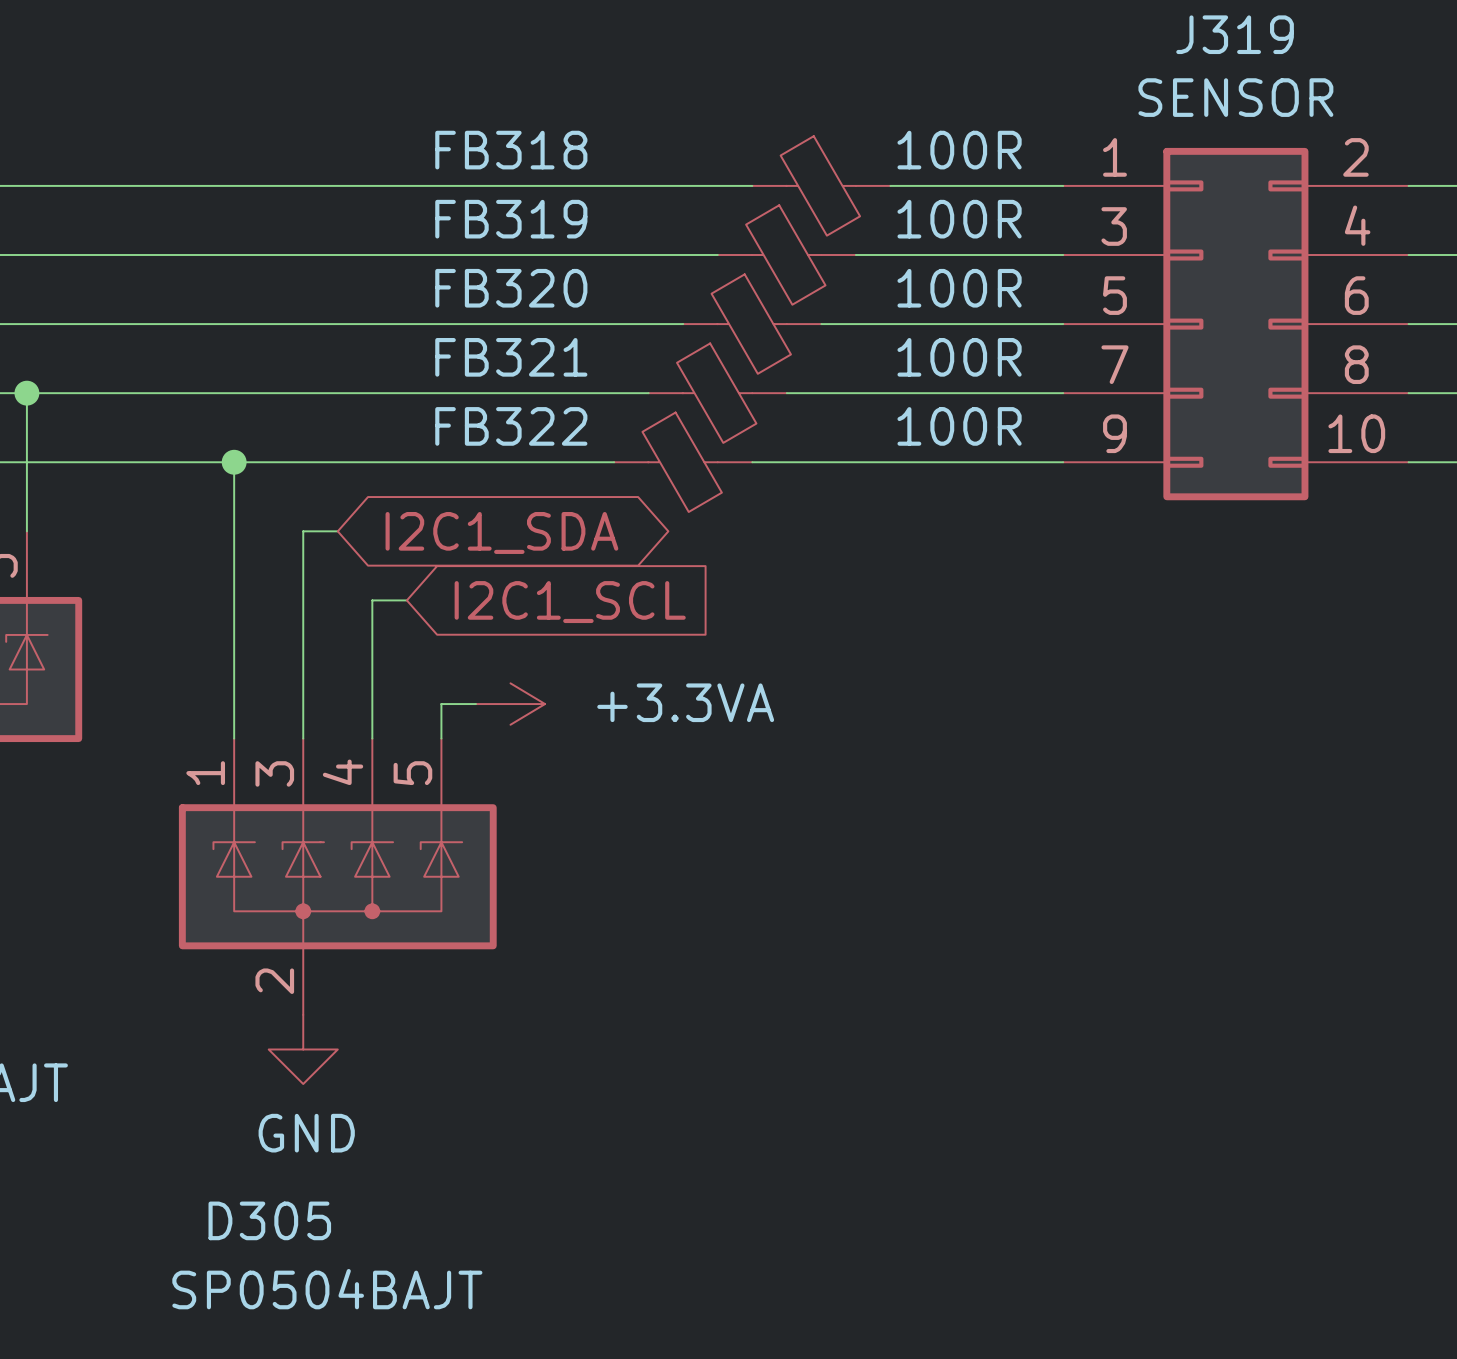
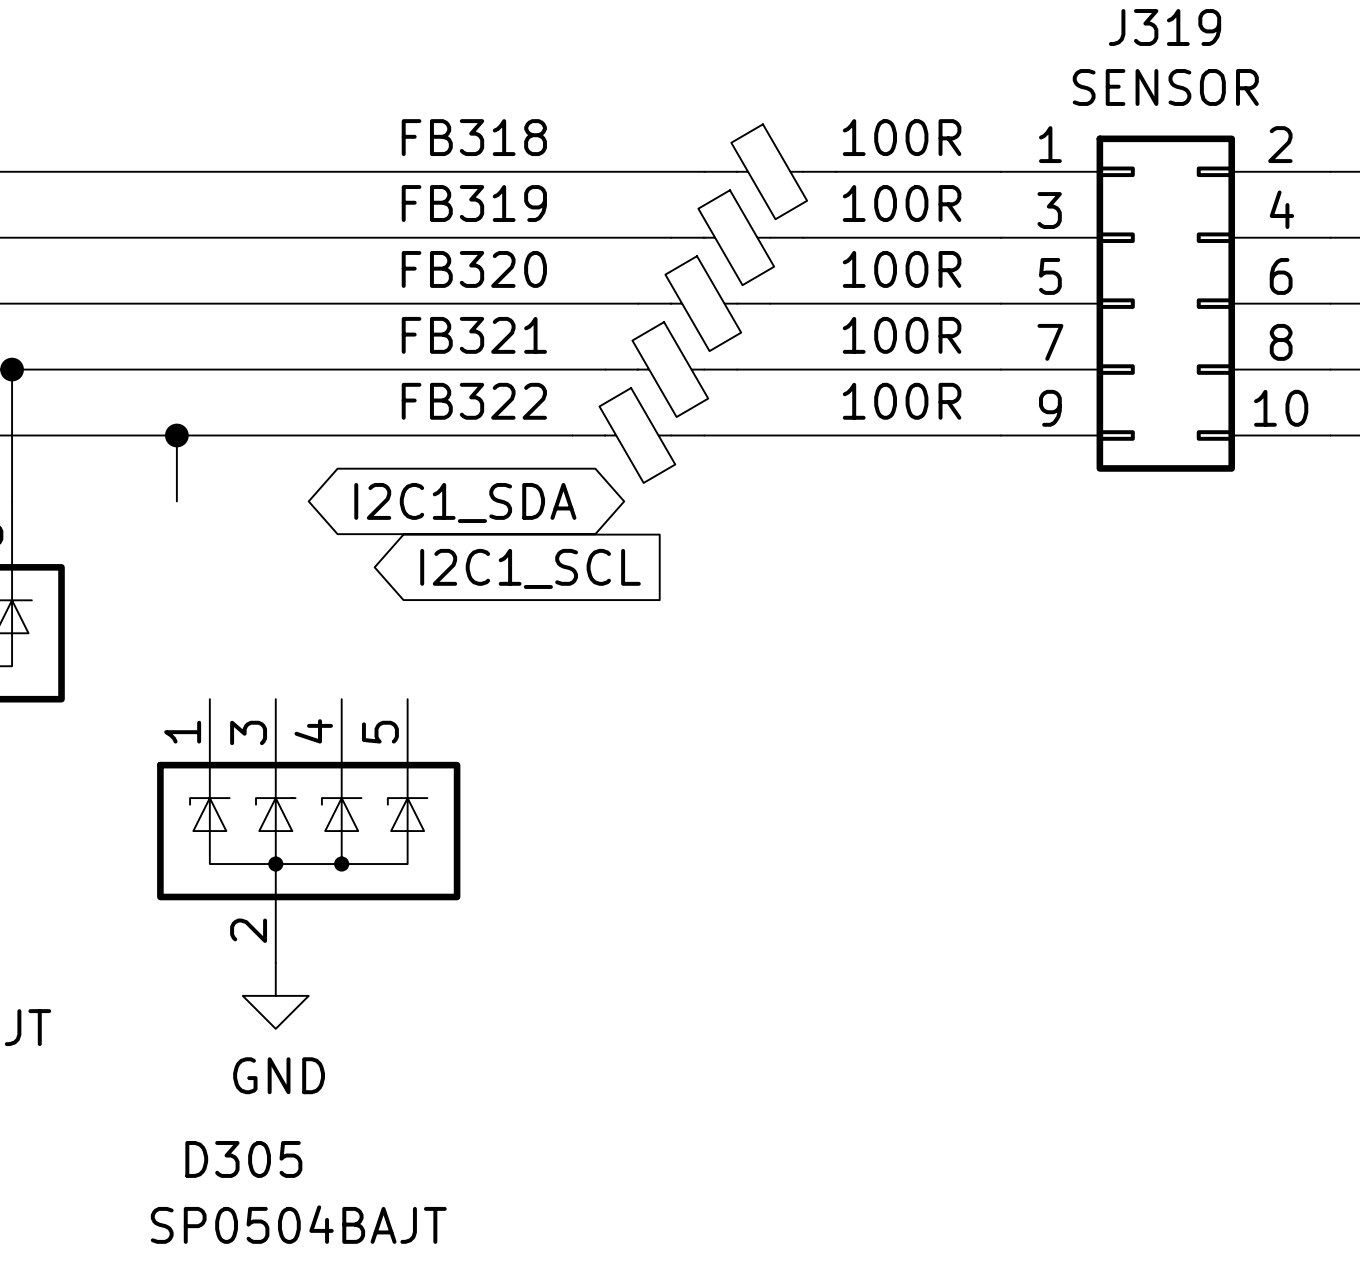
wire: none -> (176, 435) (176, 501)
wire: (234, 462) (234, 738) -> none
junction position: (234, 462) -> (176, 435)
wire: (337, 531) (303, 531) (303, 738) -> none
wire: (406, 600) (372, 600) (372, 738) -> none
wire: (475, 704) (441, 704) (441, 738) -> none
power symbol: +3.3VA (510, 704) -> none

